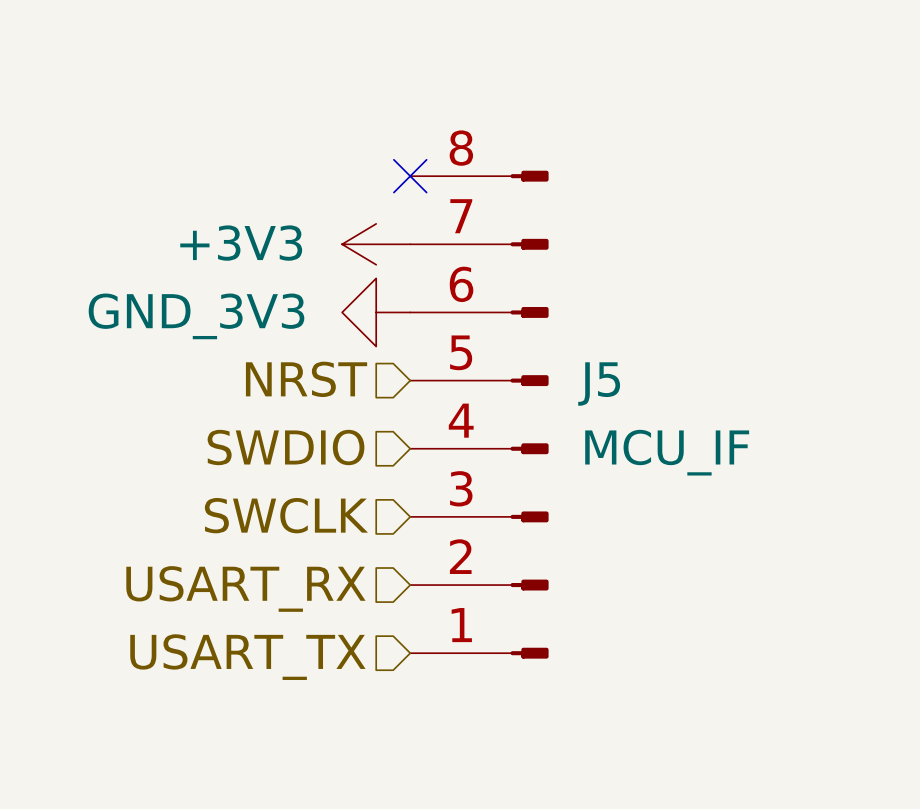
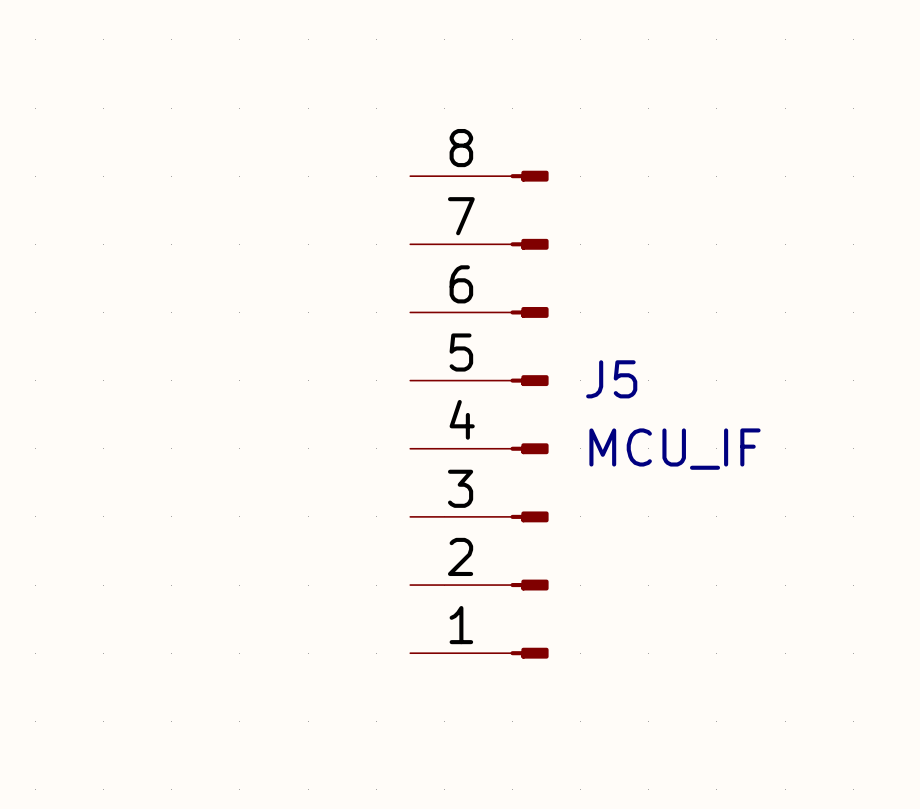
no-connect mark: (410, 176) -> none
power symbol: +3V3 (376, 244) -> none
power symbol: GND_3V3 (376, 312) -> none
hierarchical label: NRST (306, 379) -> none
hierarchical label: SWDIO (286, 447) -> none
hierarchical label: SWCLK (286, 515) -> none
hierarchical label: USART_RX (245, 588) -> none
hierarchical label: USART_TX (247, 657) -> none

